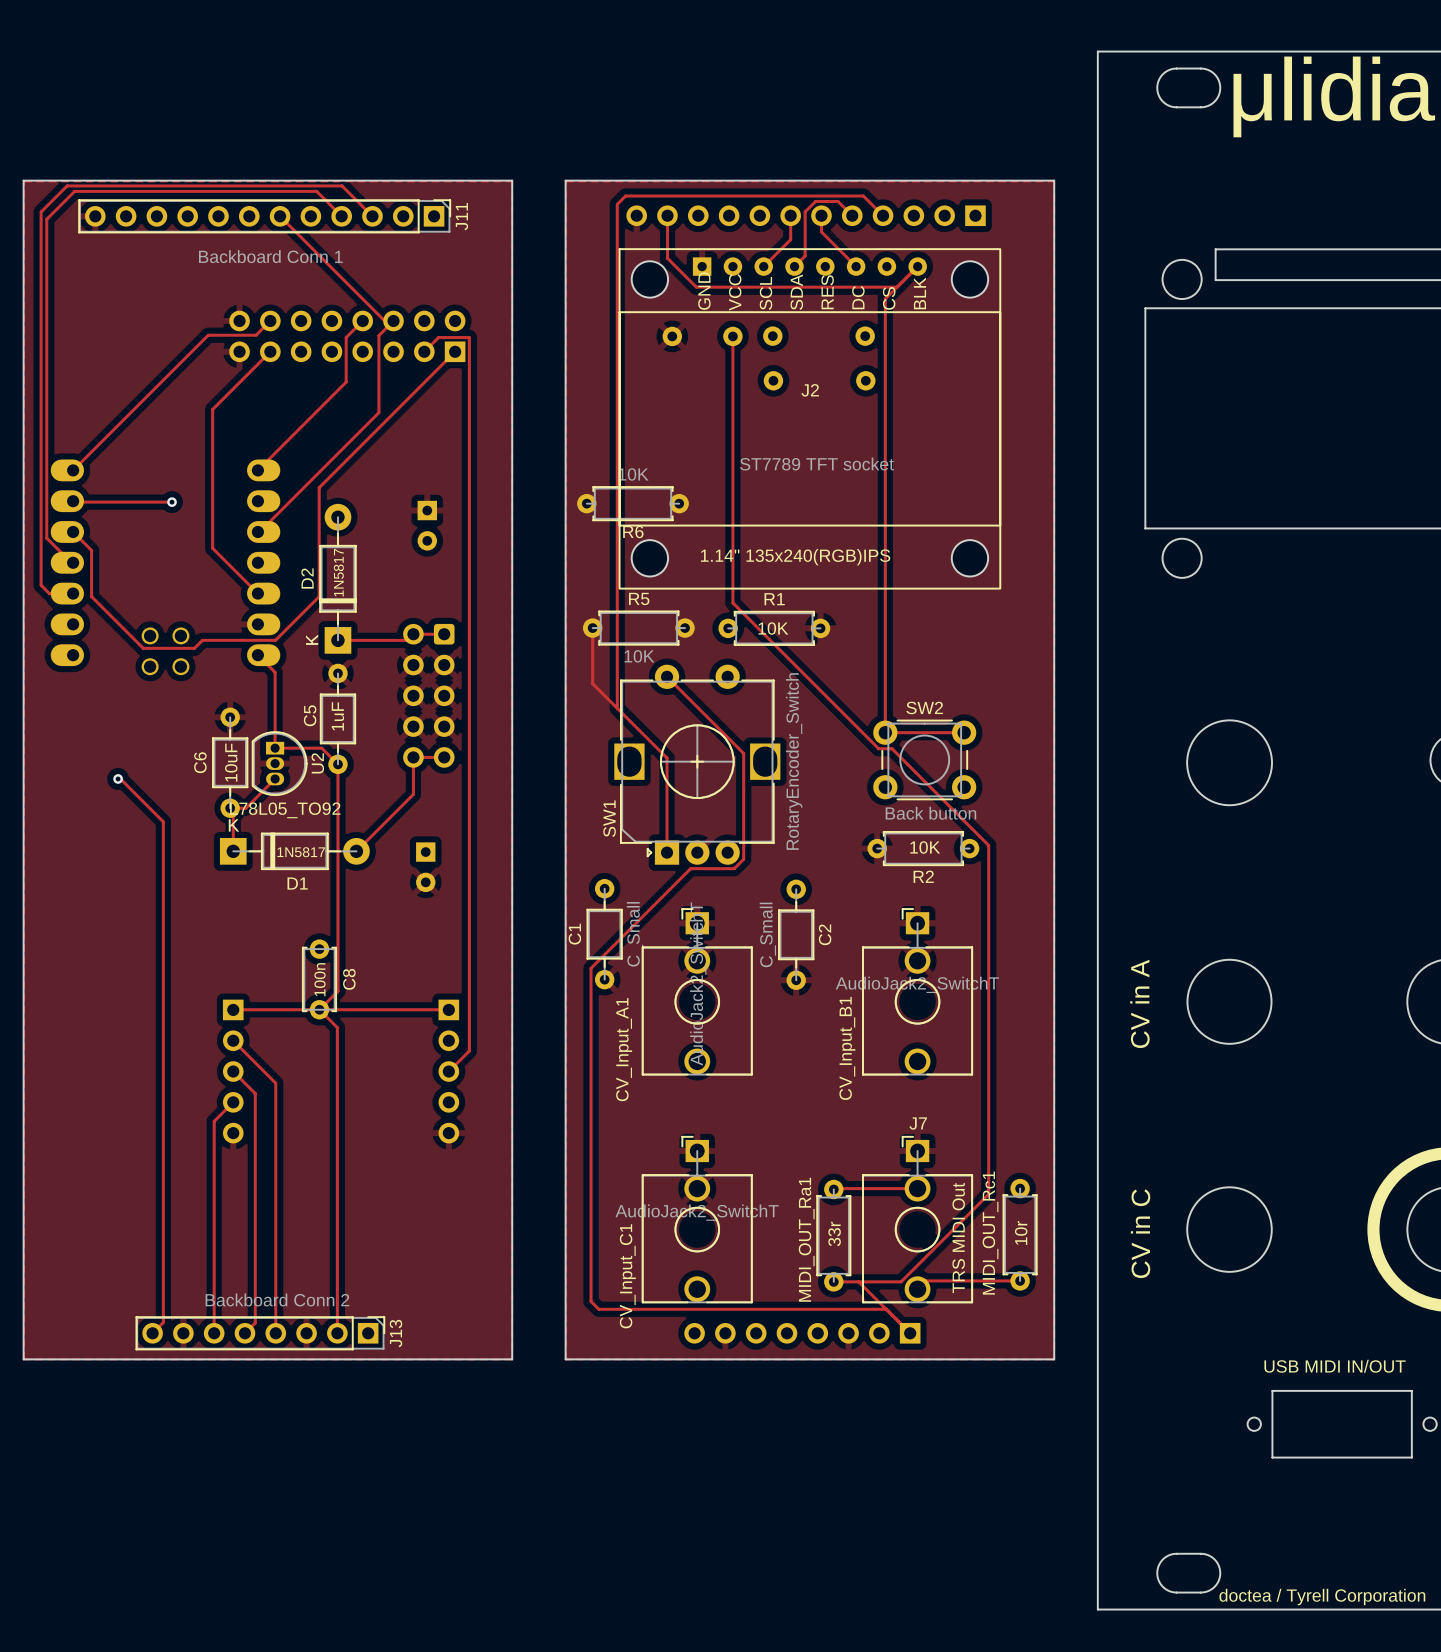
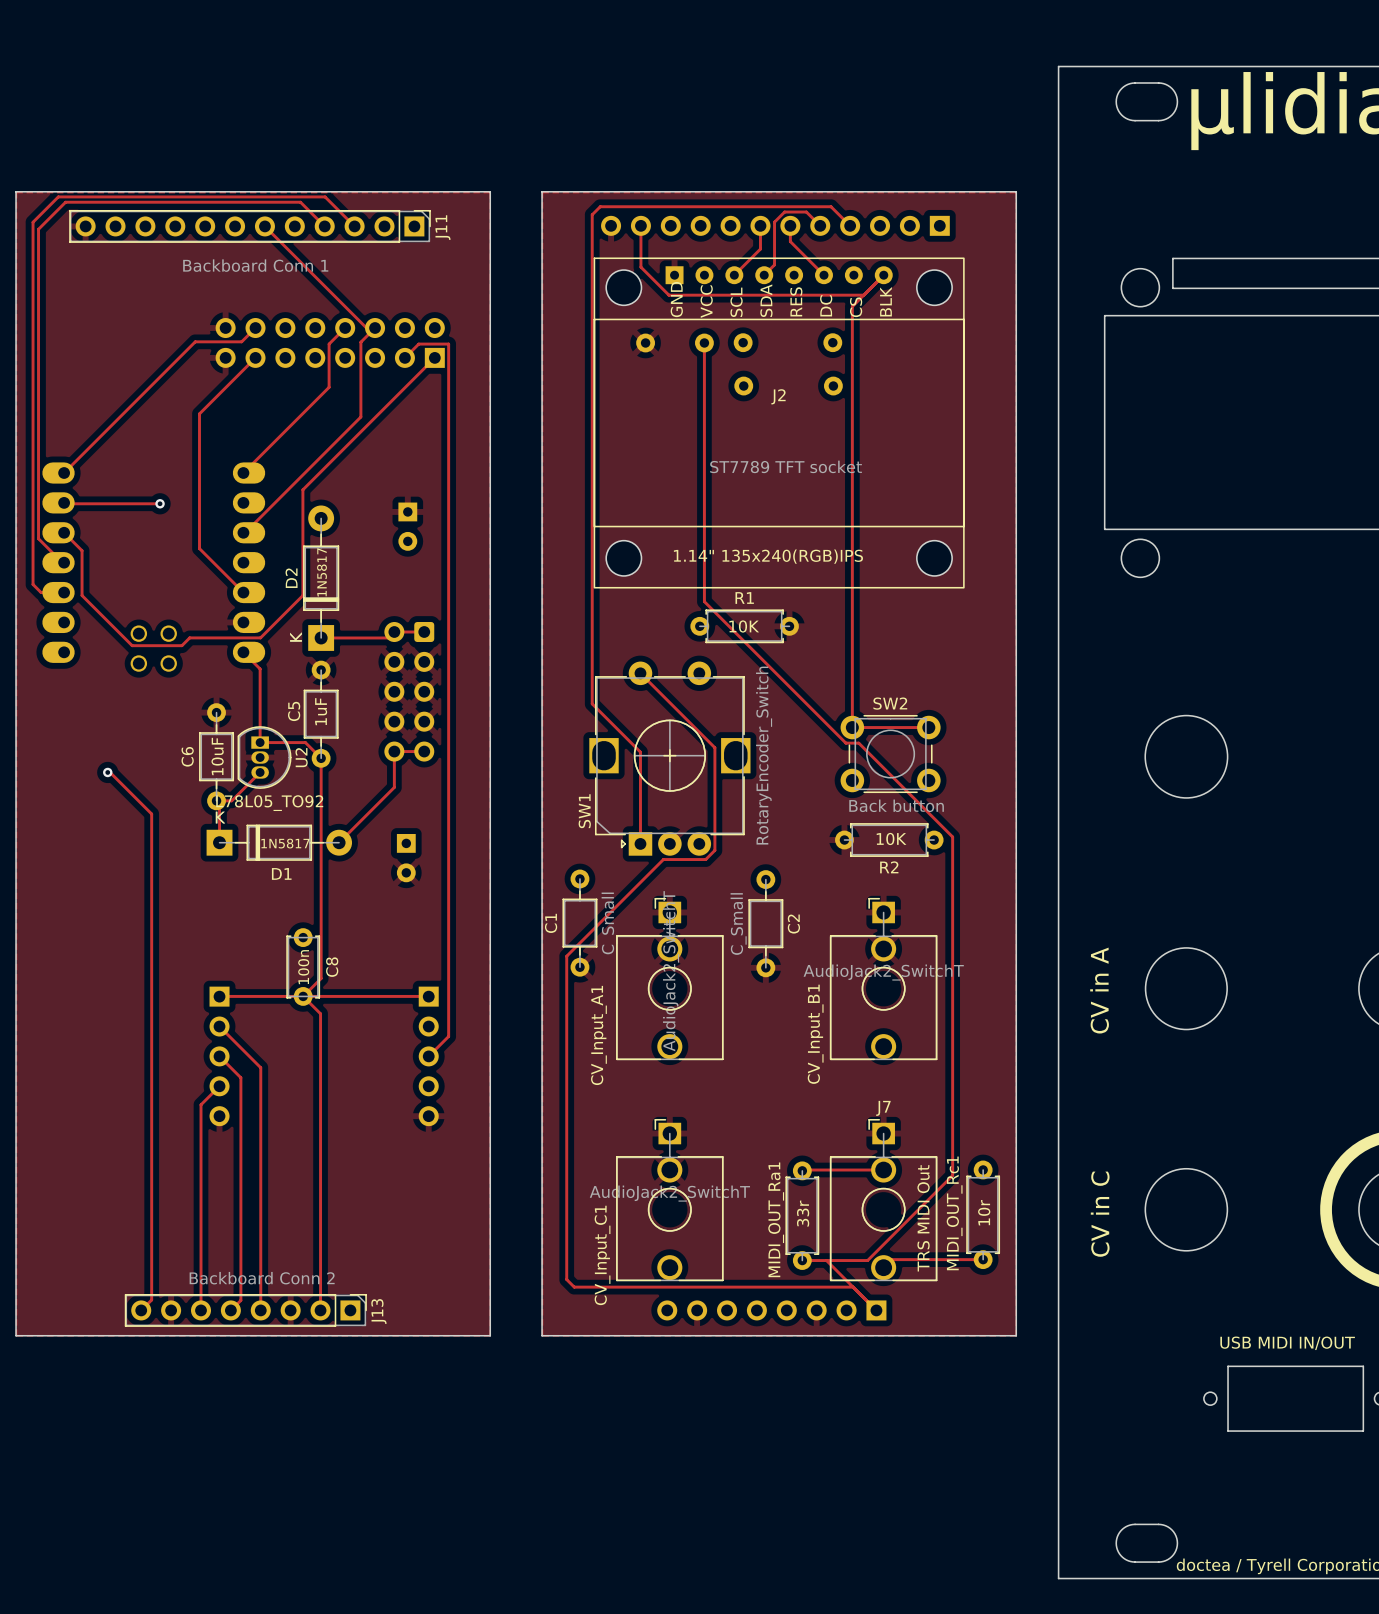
R6: 10K (633, 503) -> none
track: (592, 628) (592, 683) (617, 708) -> none
R5: 10K (638, 628) -> none

